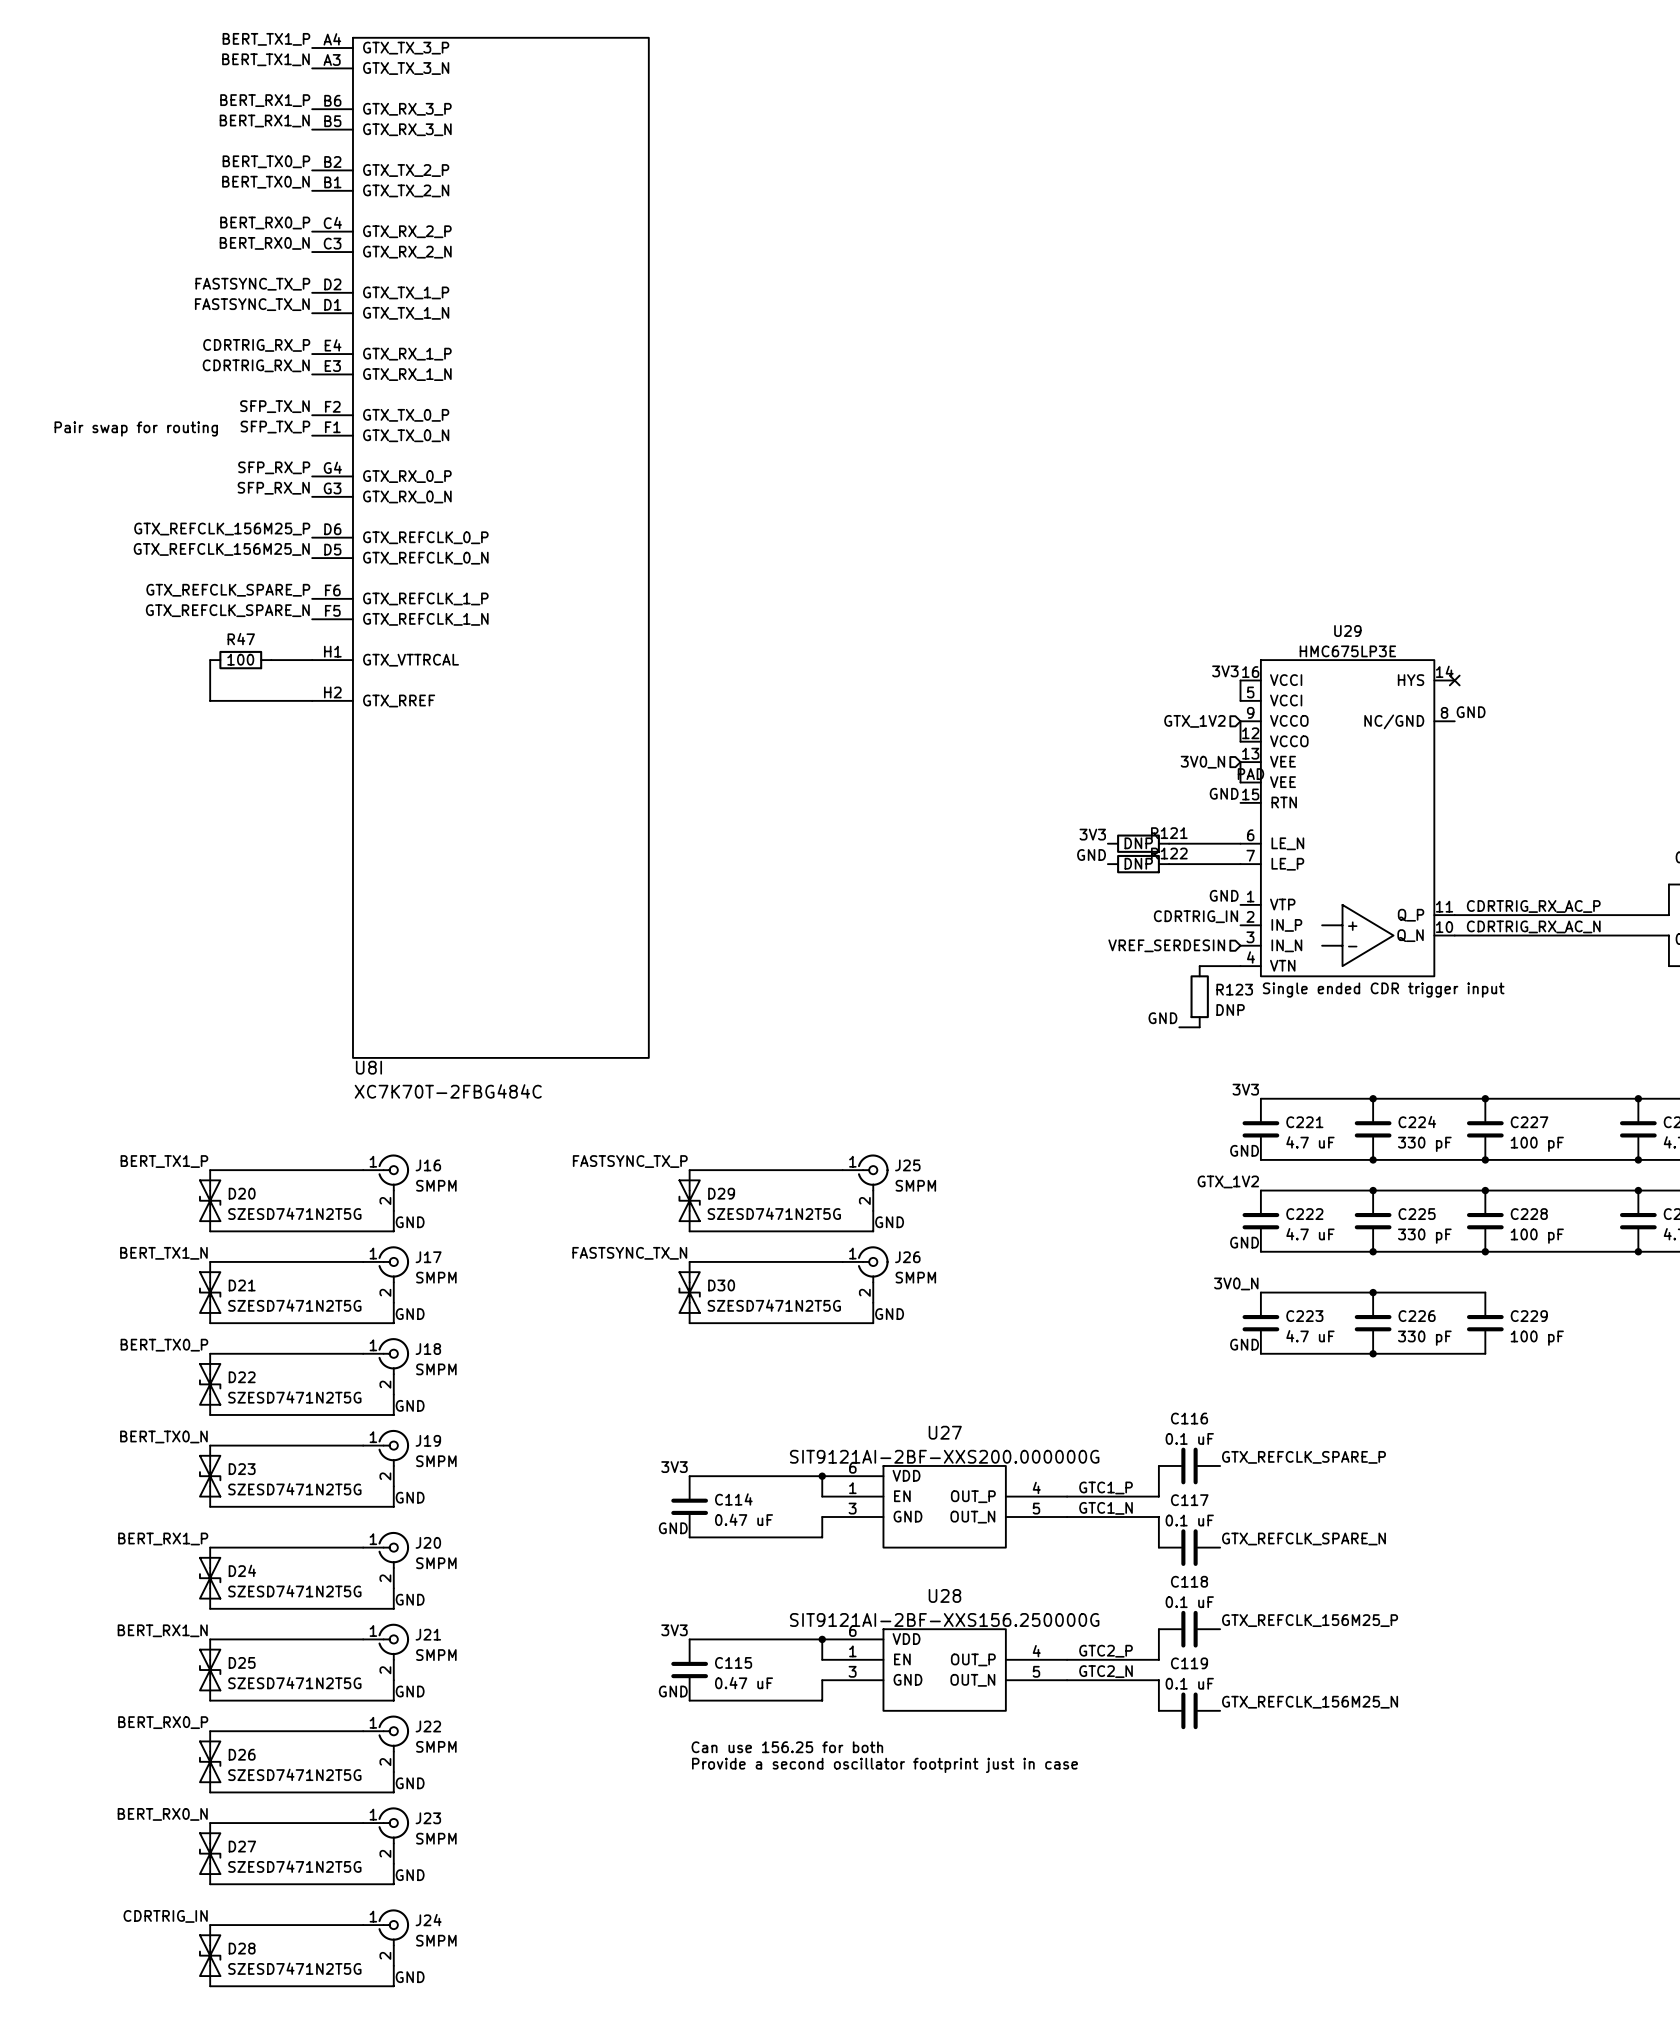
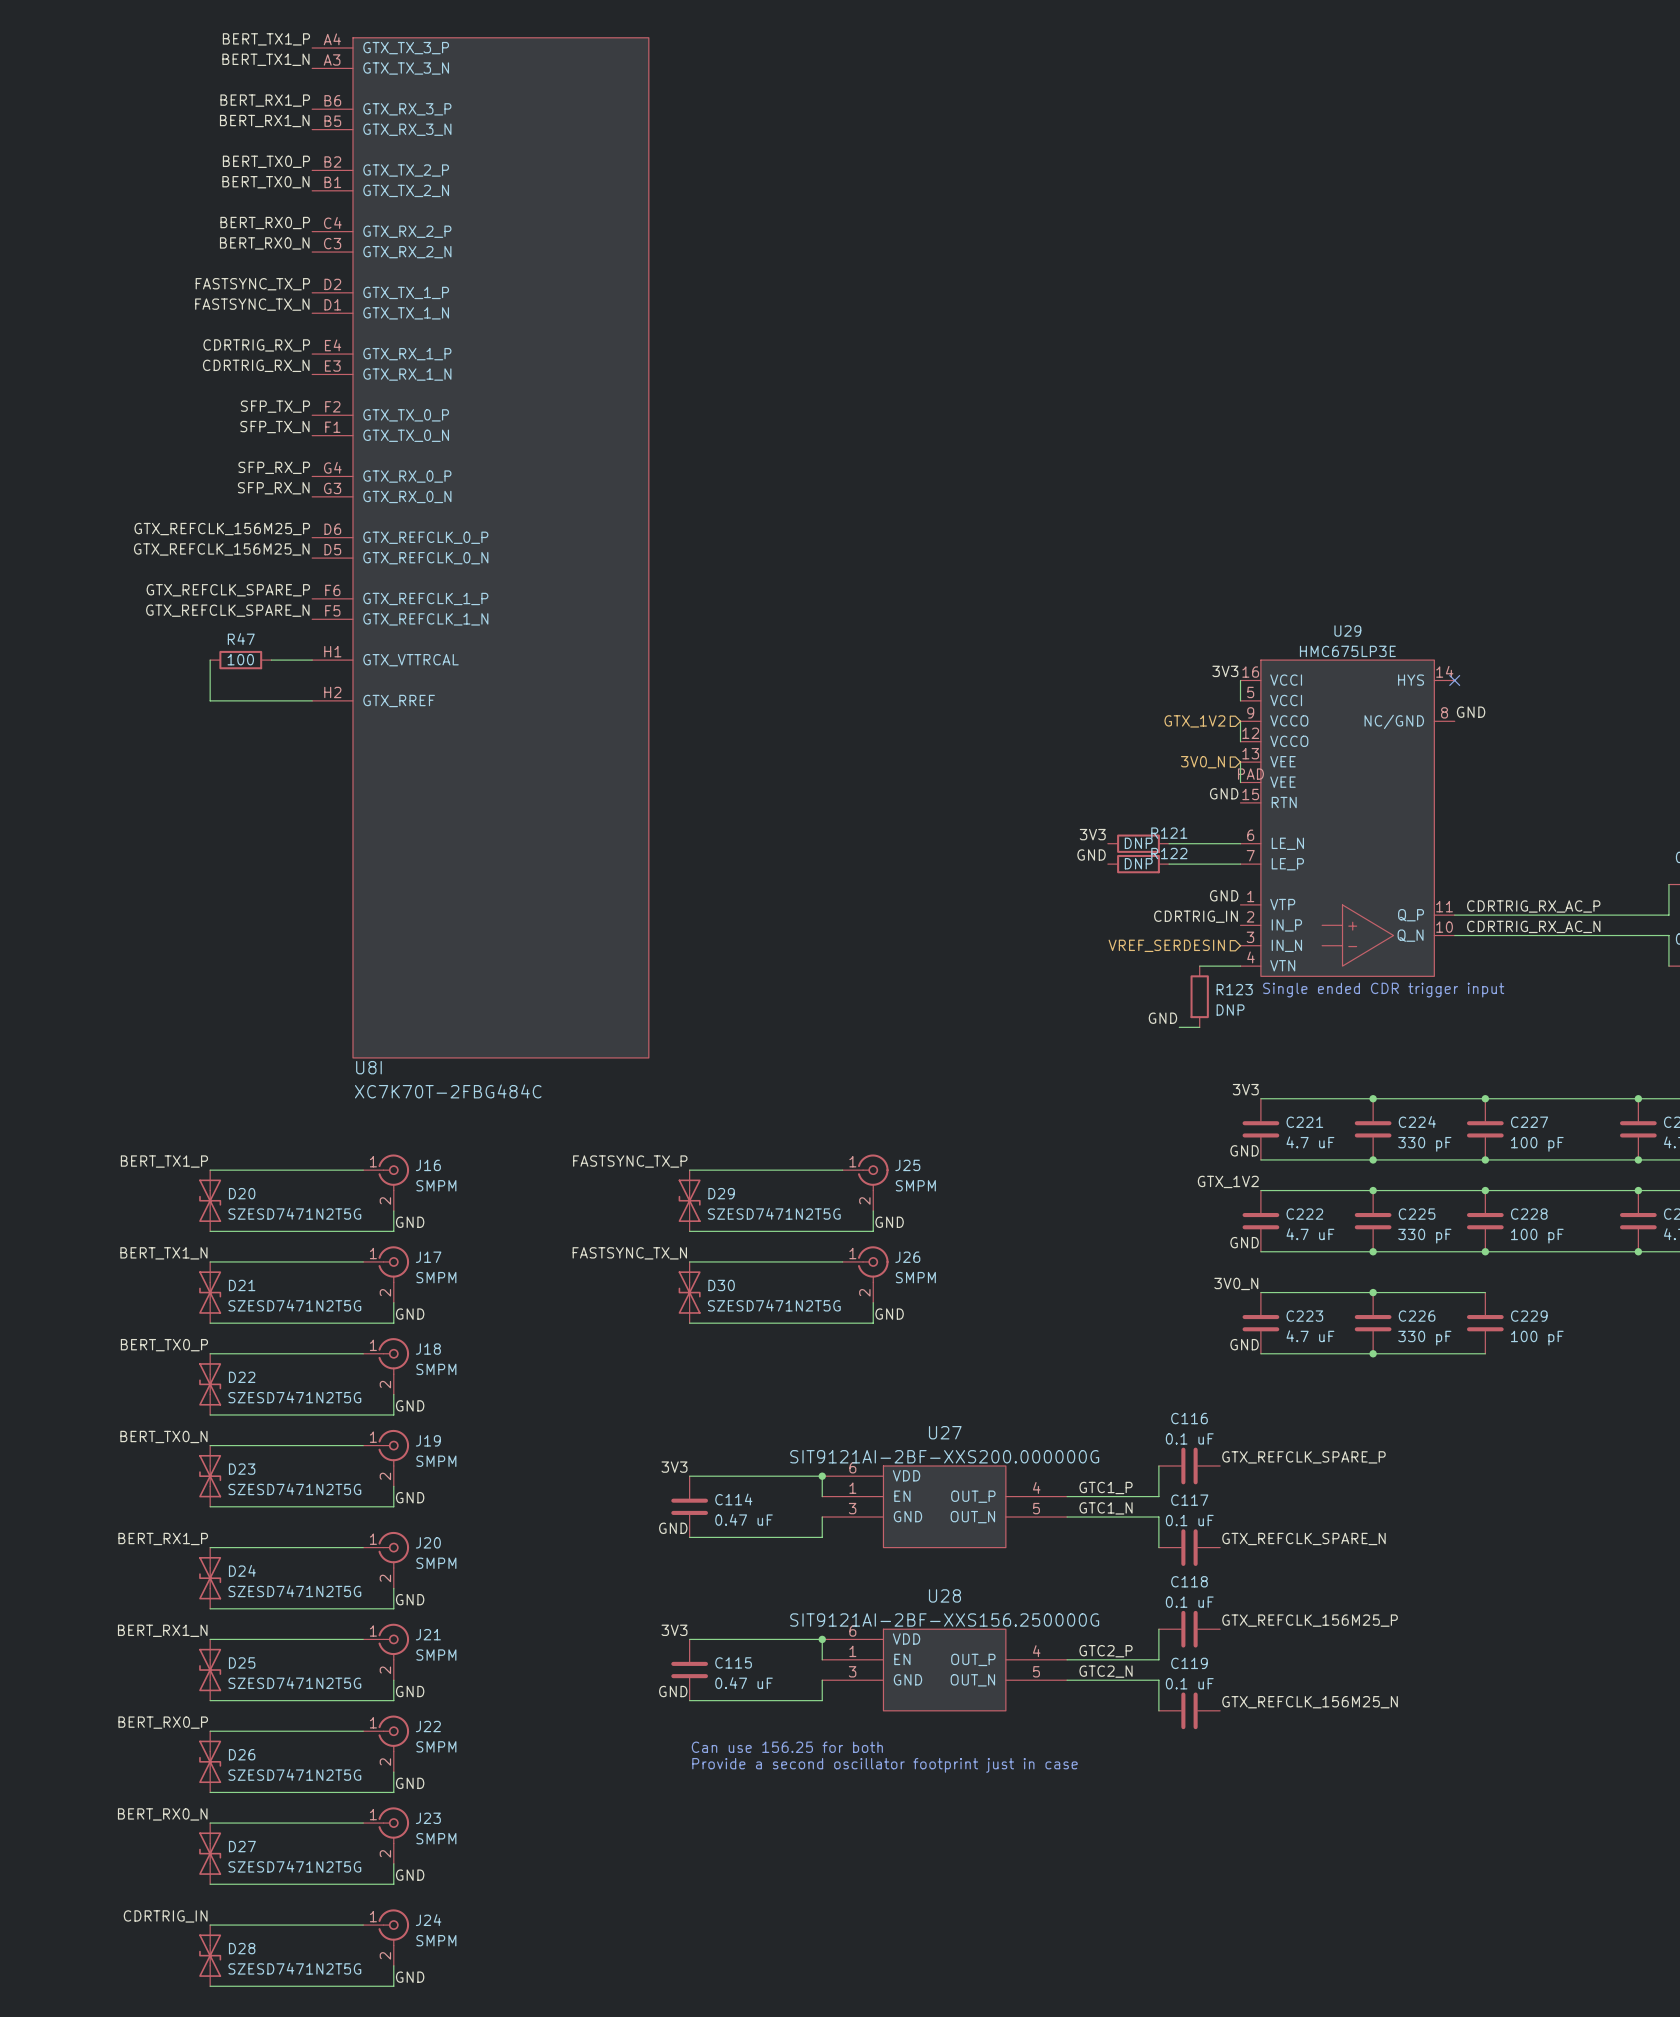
label: SFP_TX_N (274, 406) -> SFP_TX_P (275, 406)
label: SFP_TX_P (275, 427) -> SFP_TX_N (274, 427)
text: Pair swap for routing (136, 428) -> none

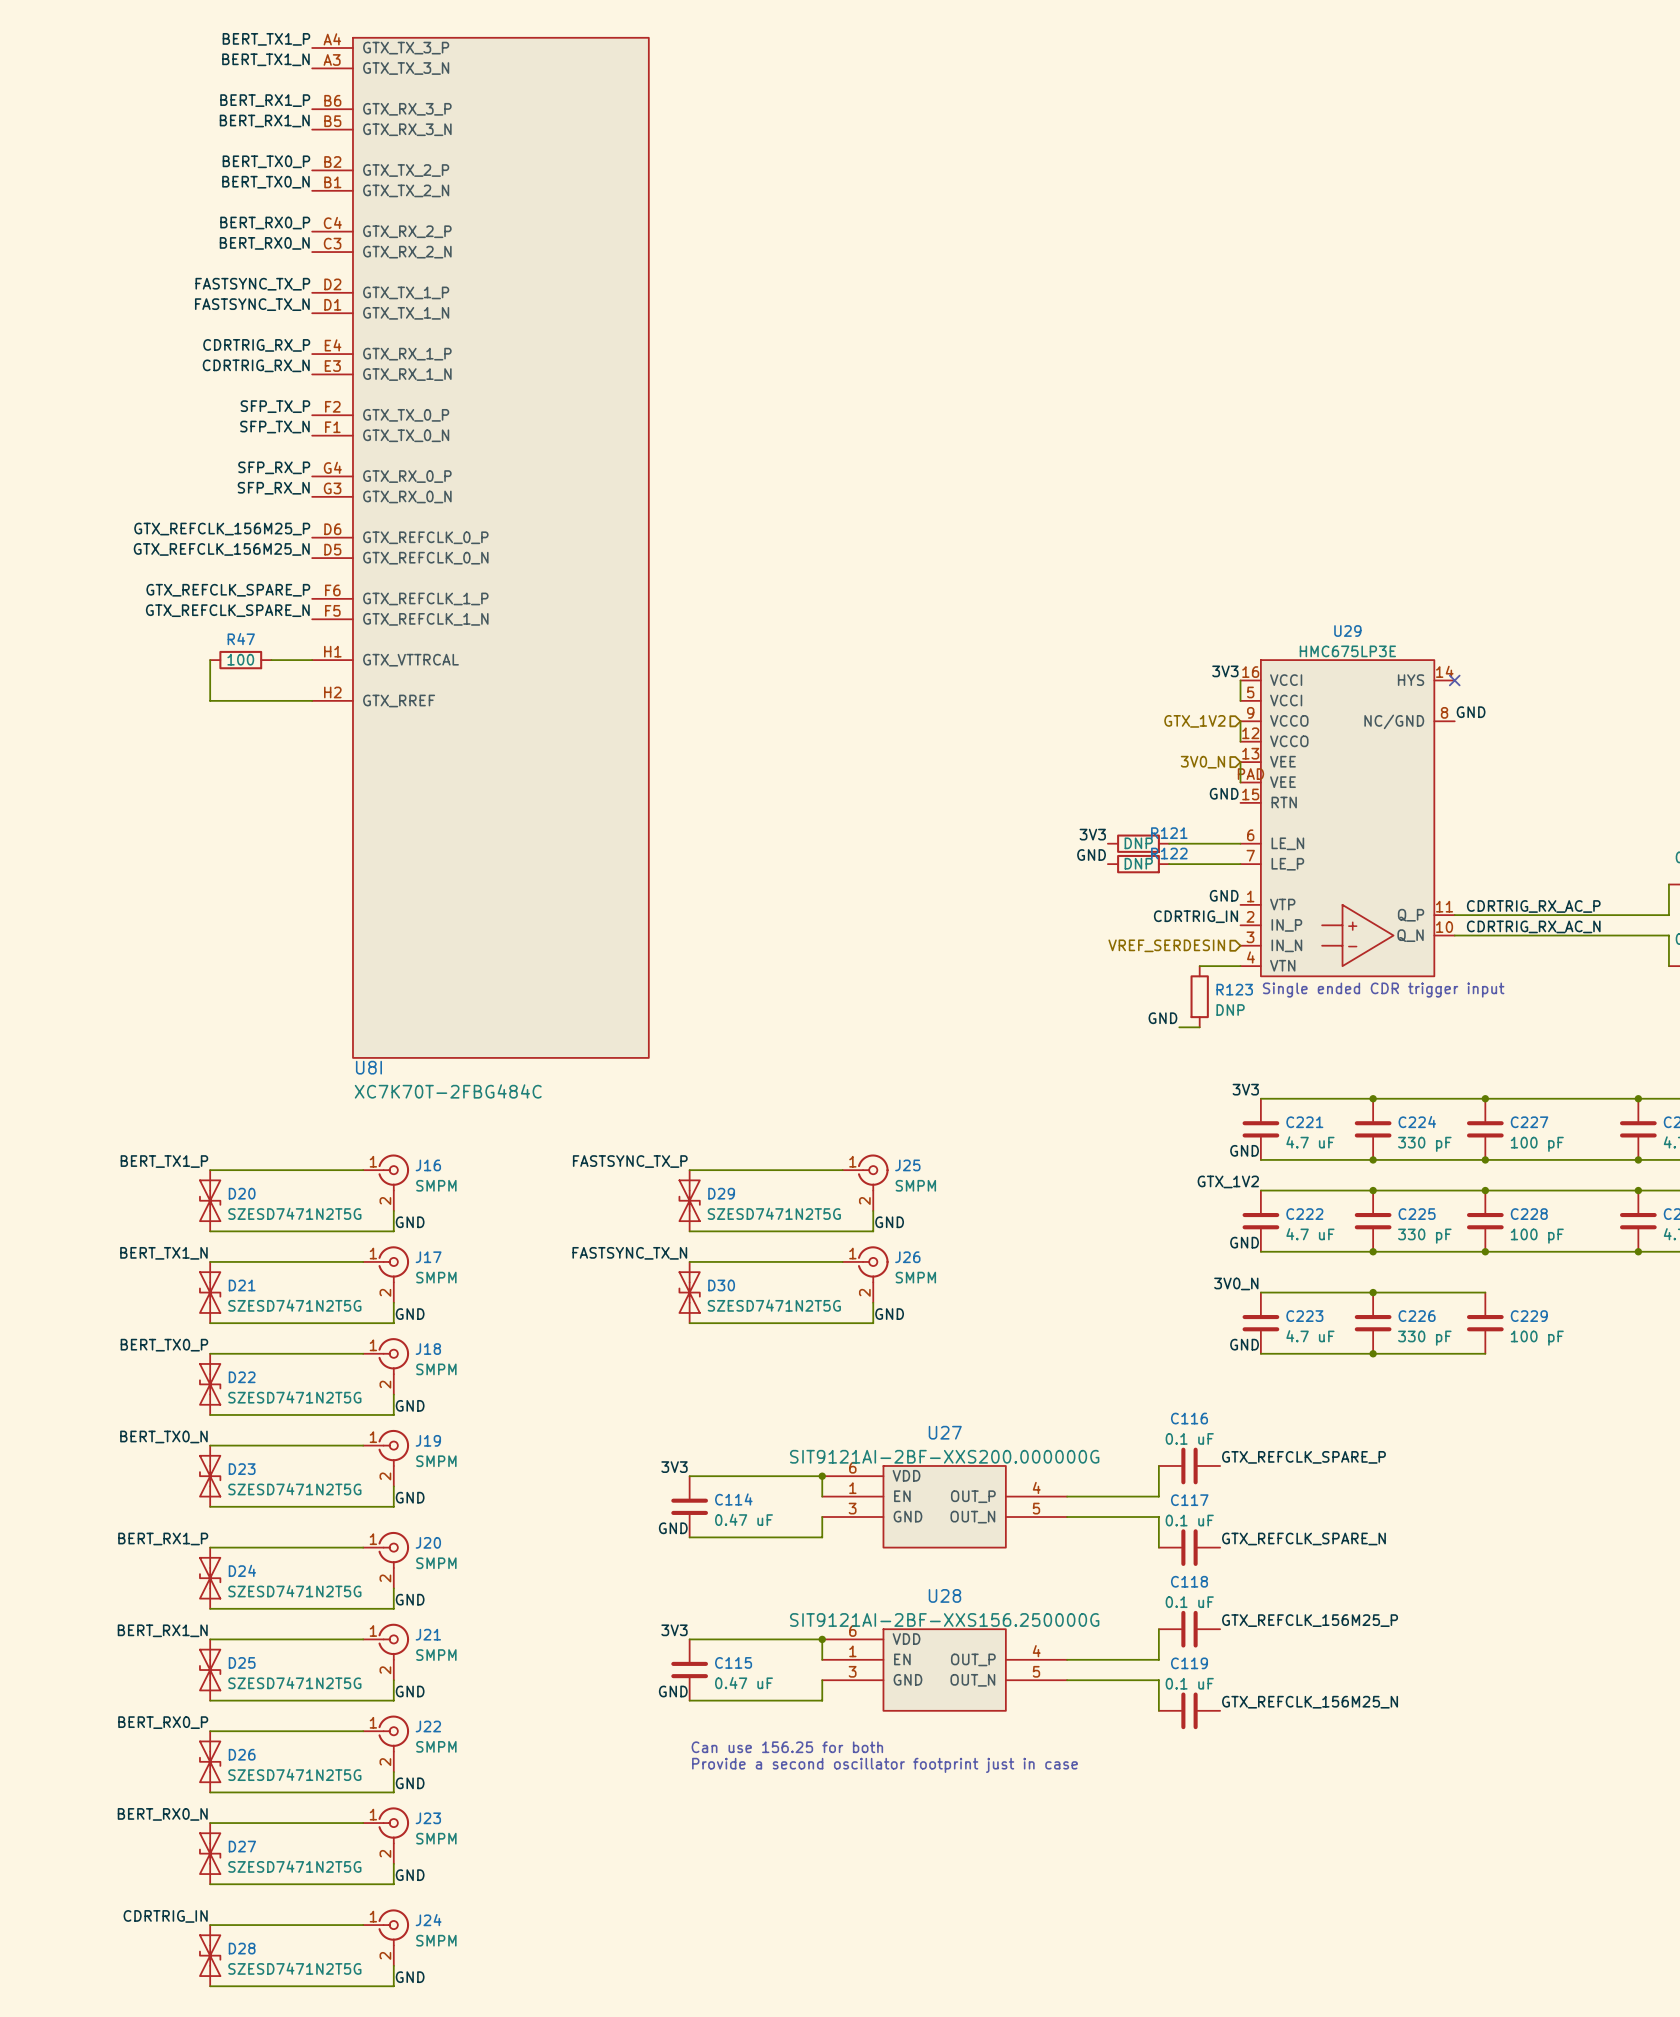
label: GTC1_P (1106, 1487) -> none
label: GTC1_N (1106, 1508) -> none
label: GTC2_P (1106, 1651) -> none
label: GTC2_N (1106, 1671) -> none

